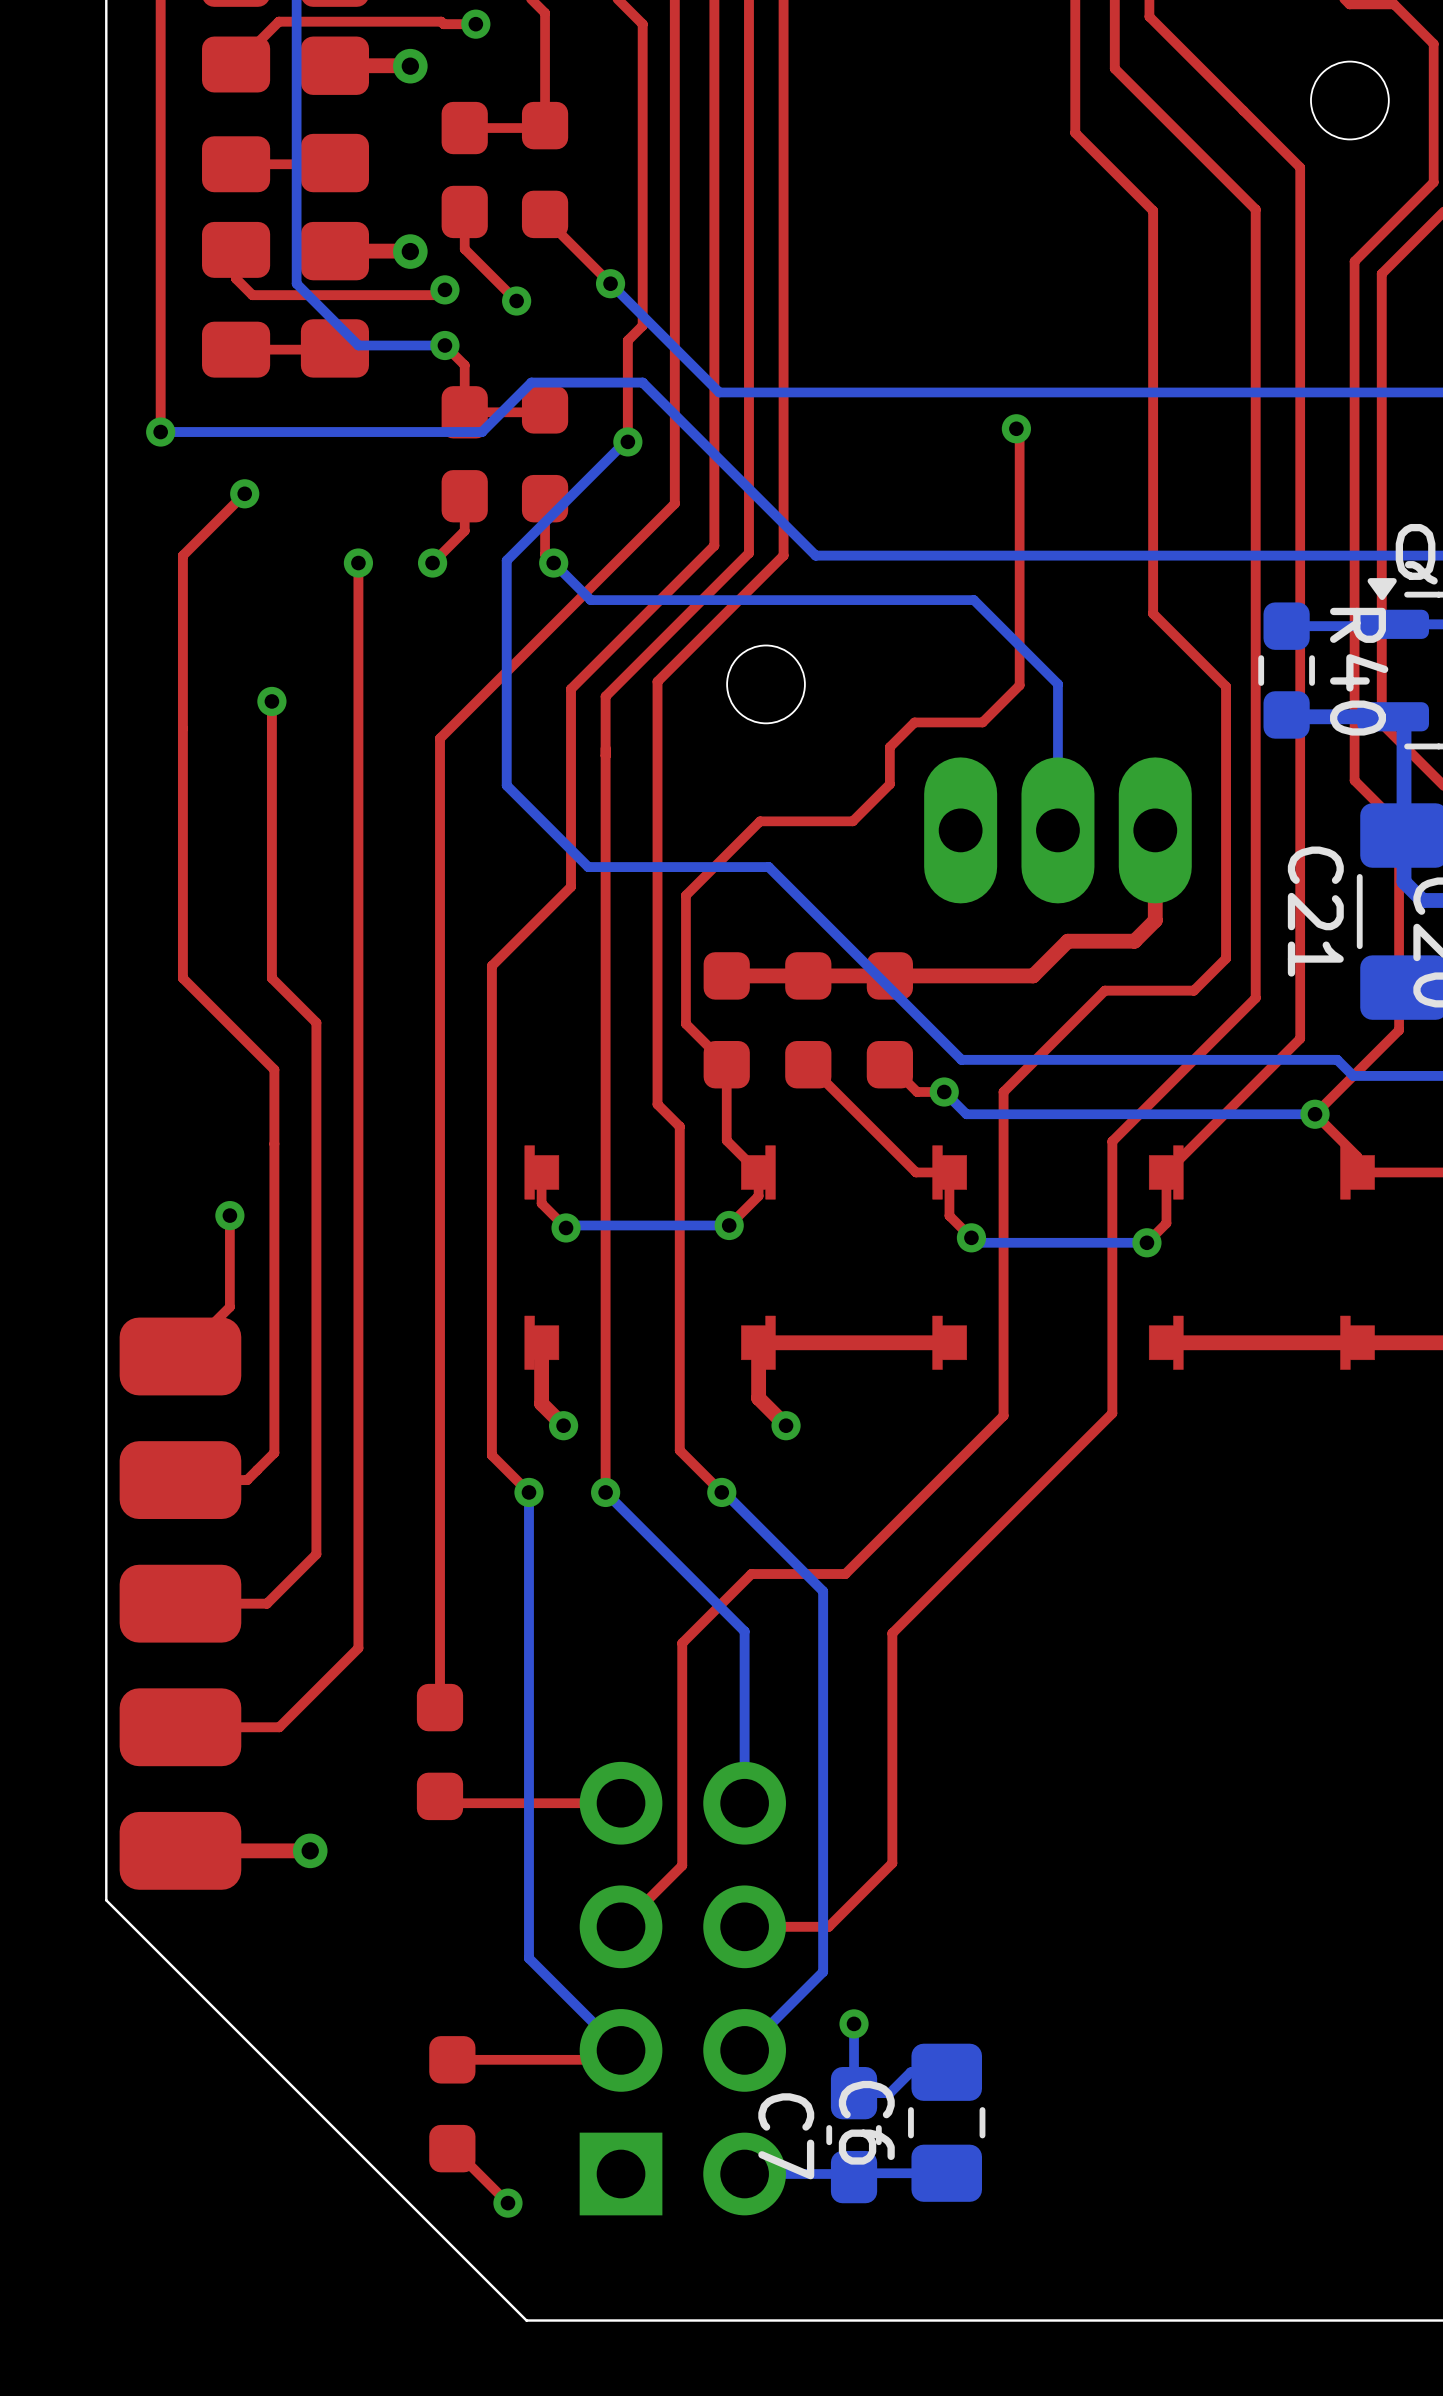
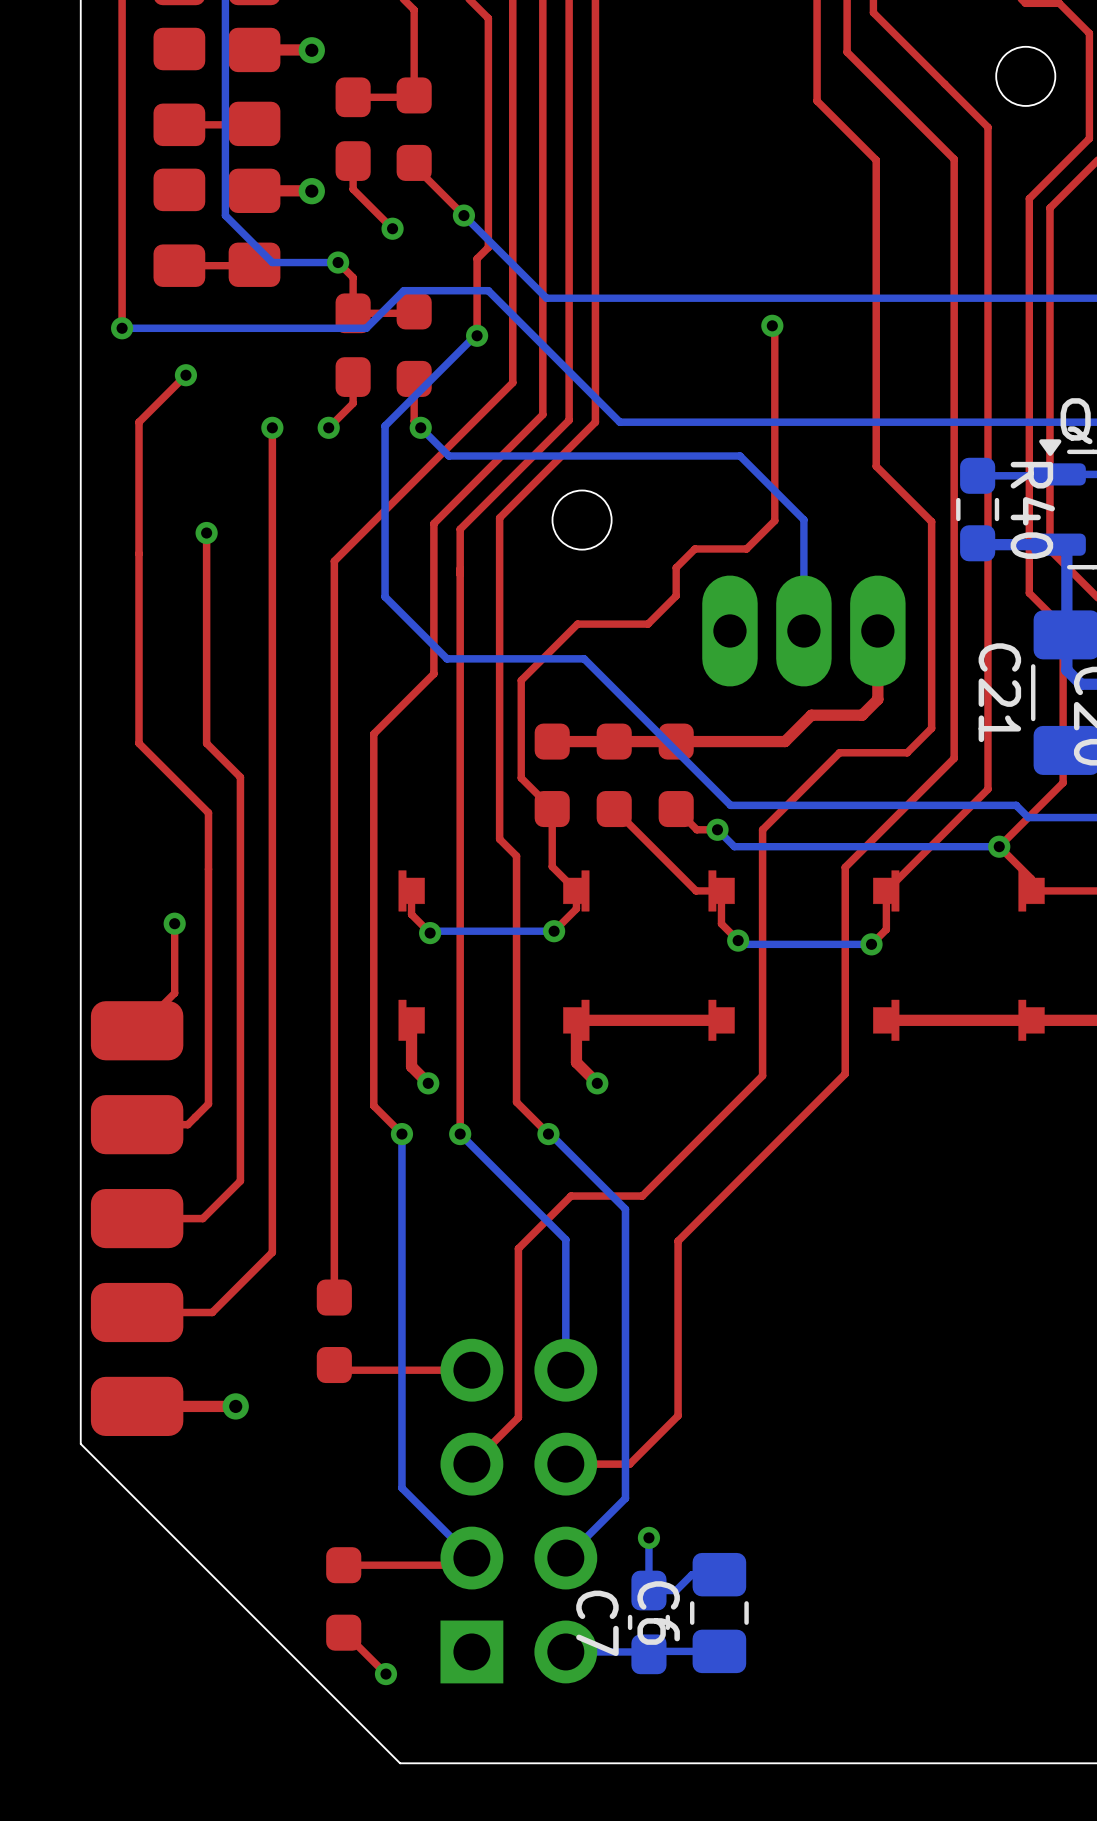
top track: (475, 24) (443, 24) (441, 21) (278, 21) (236, 64) -> none
via: (475, 24) -> none
top track: (236, 249) (236, 278) (252, 295) (439, 295) (444, 289) -> none
via: (444, 289) -> none

